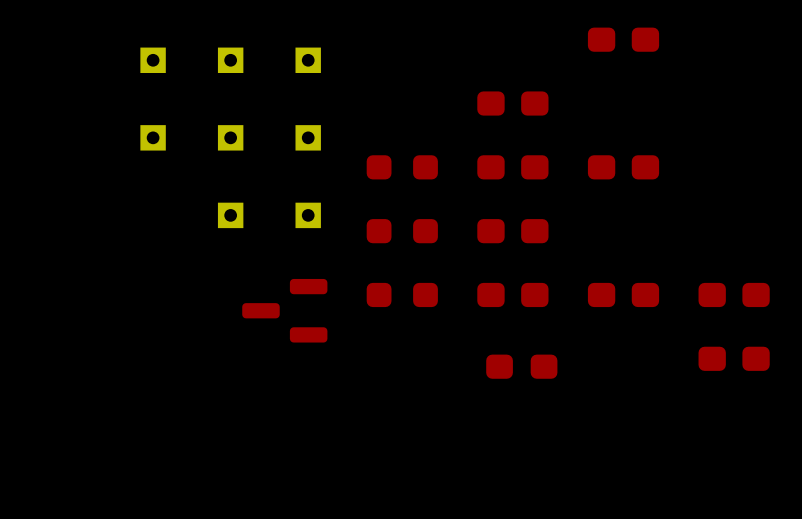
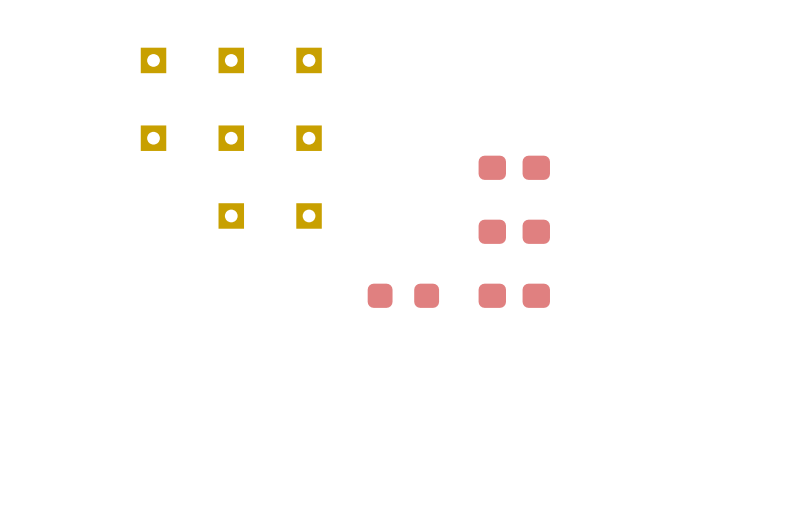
part: (623, 39) -> none
part: (512, 103) -> none
part: (402, 167) -> none
part: (623, 167) -> none
part: (402, 231) -> none
part: (623, 294) -> none
part: (734, 294) -> none
part: (284, 310) -> none
part: (734, 358) -> none
part: (521, 366) -> none

